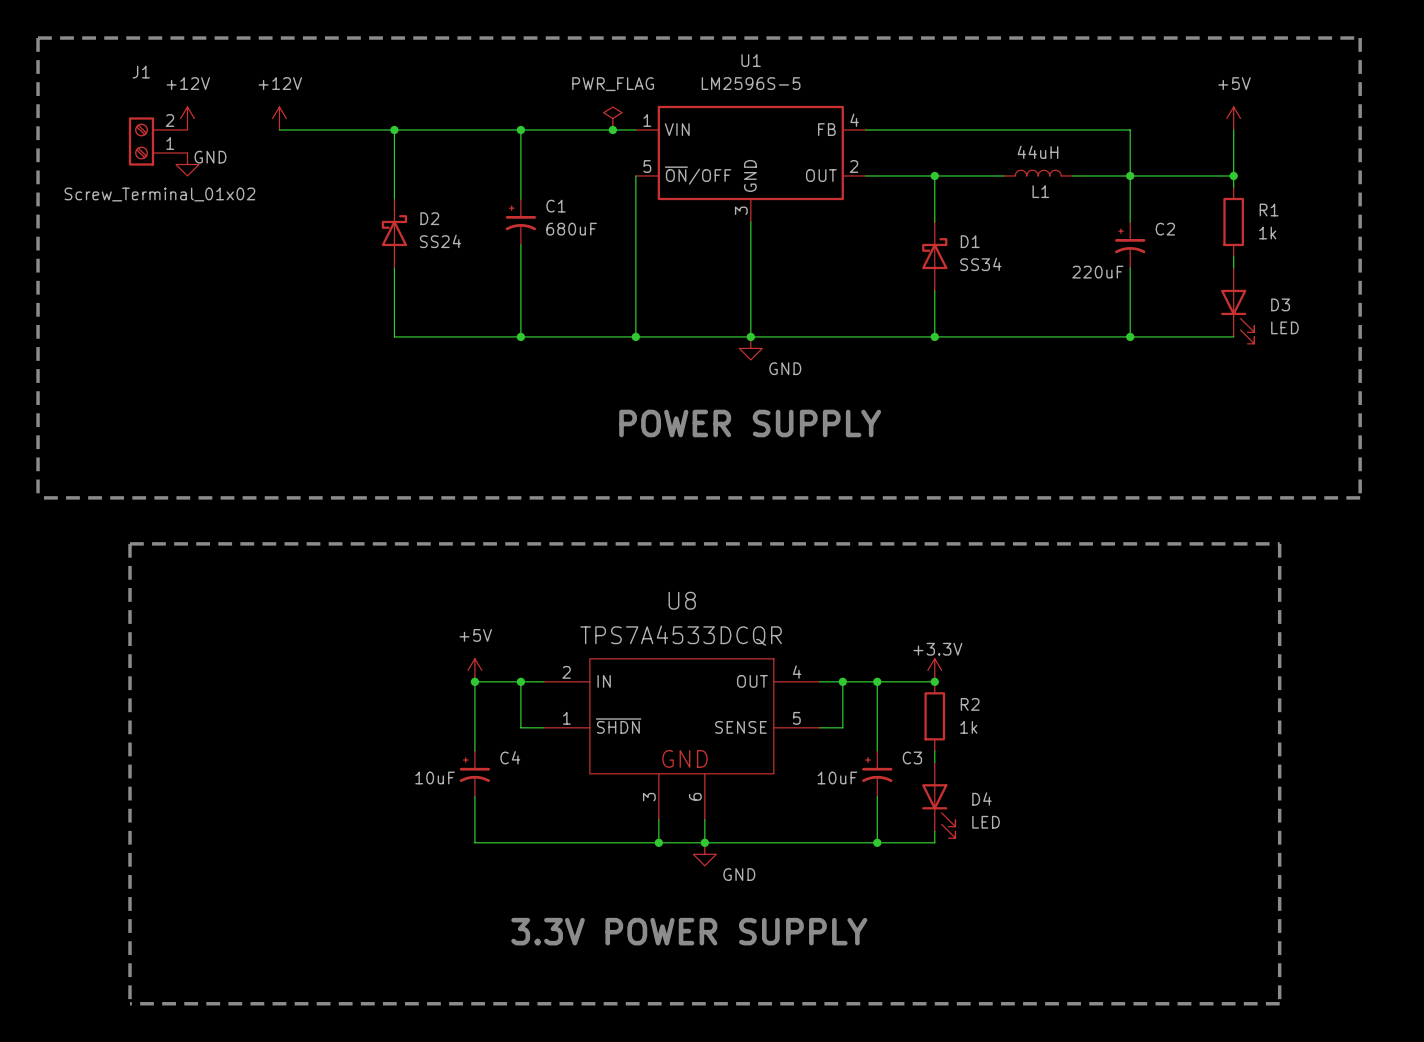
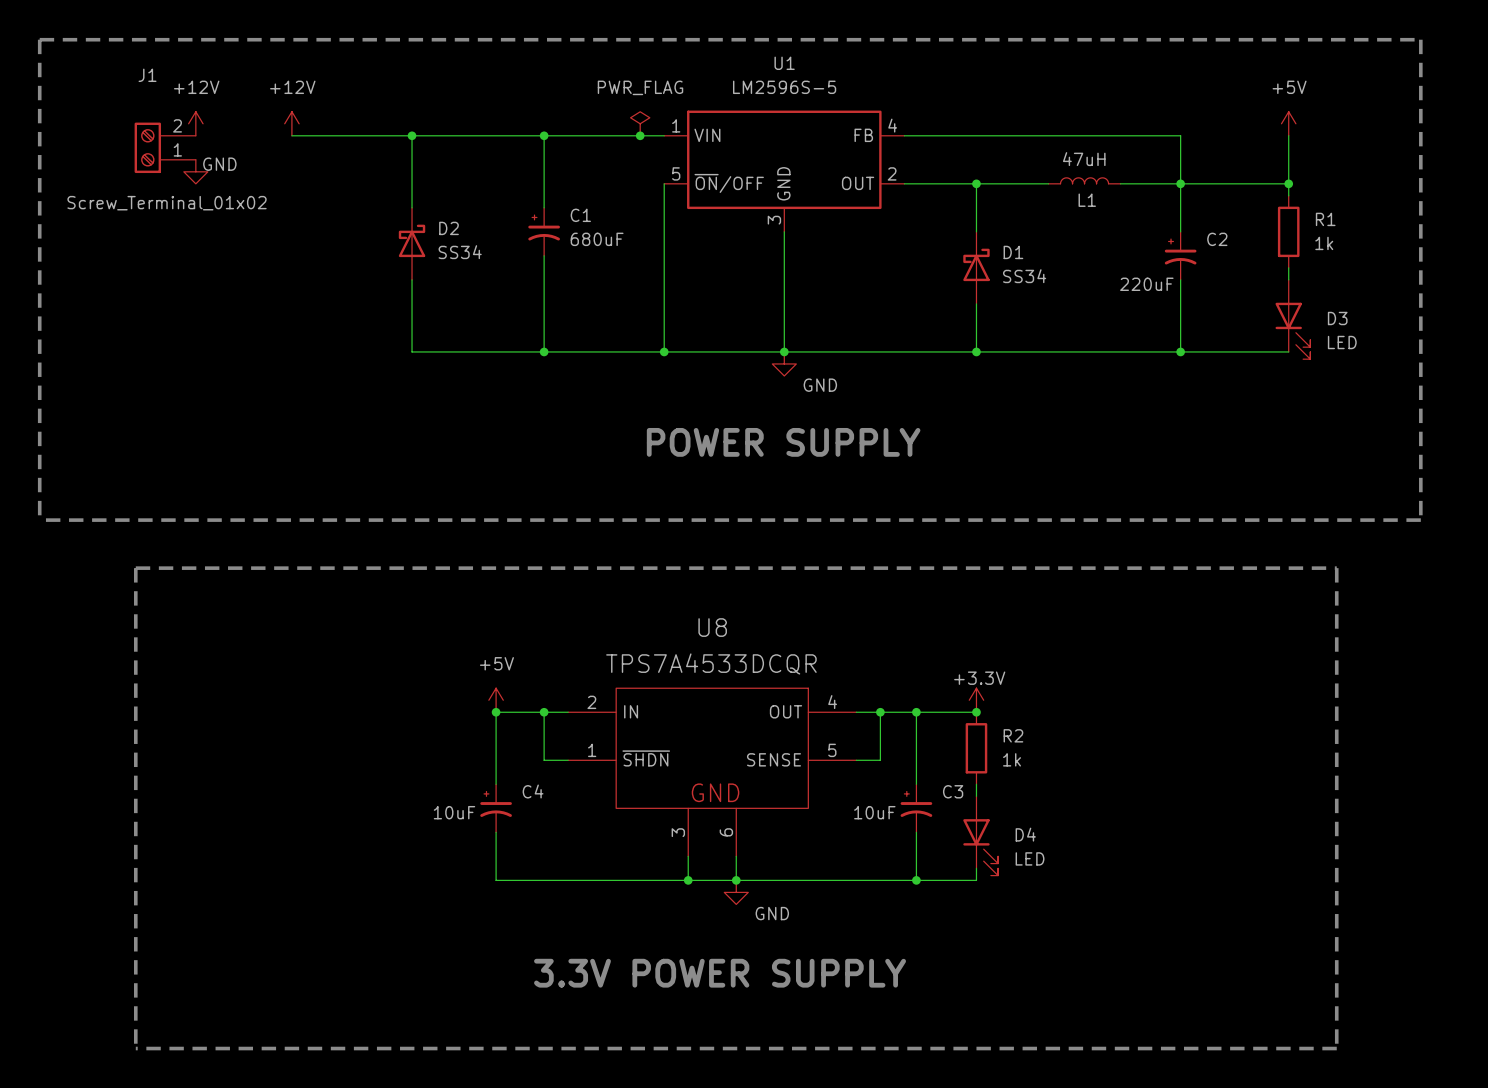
L1 value: 44uH (1037, 152) -> 47uH (1084, 159)
D2 value: SS24 (440, 241) -> SS34 (460, 252)

